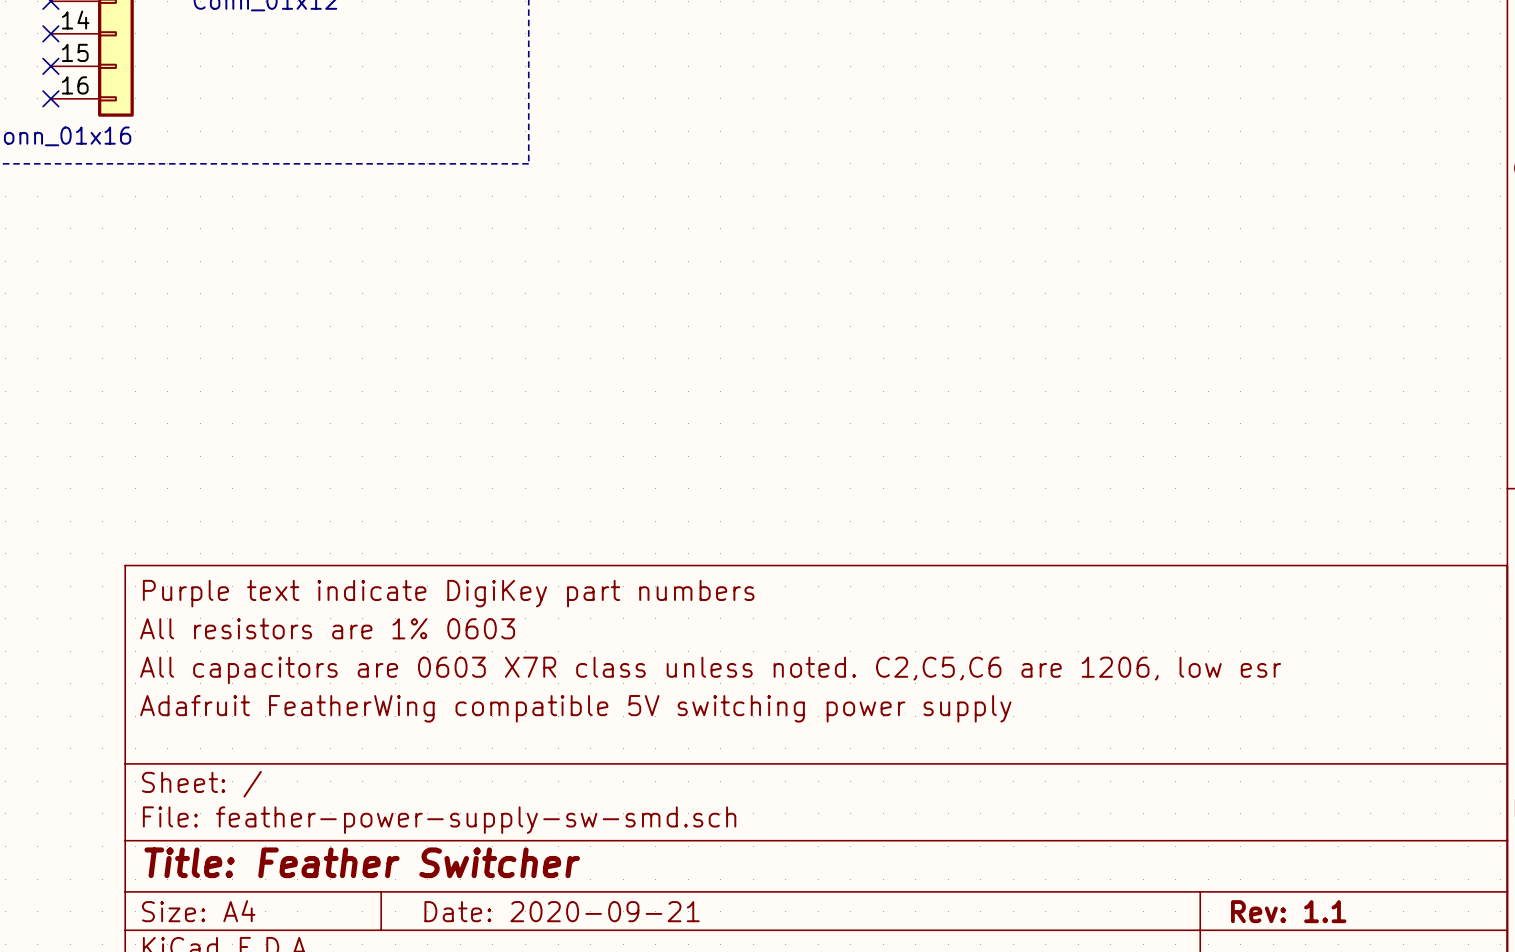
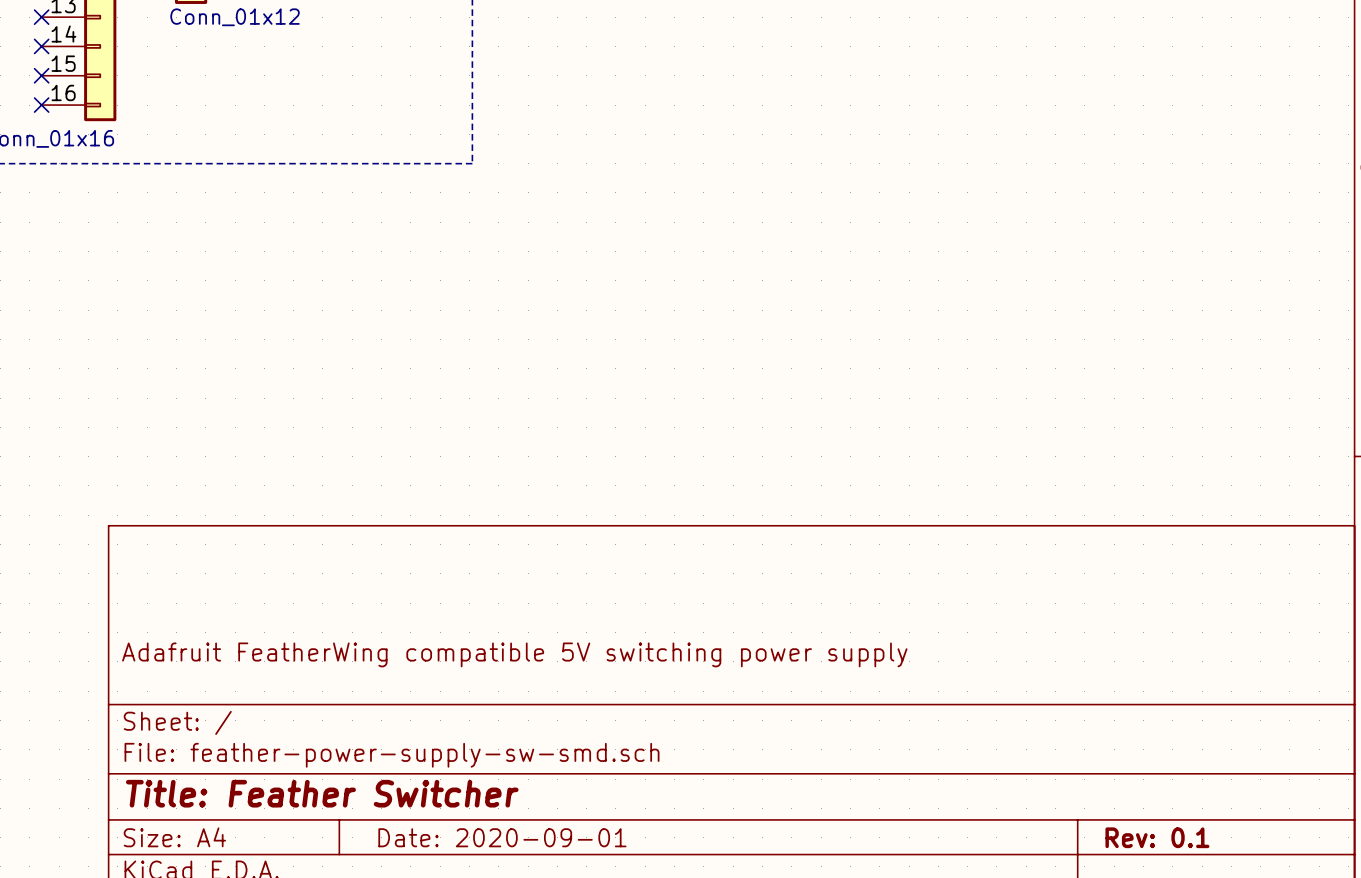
title block: Purple text indicate DigiKey part numbers (448, 593) -> none
title block: All resistors are 1% 0603 (327, 628) -> none
title block: All capacitors are 0603 X7R class unless noted. C2,C5,C6 are 1206, low esr (710, 670) -> none
title block: Date: 2020-09-21 (562, 911) -> Date: 2020-09-01 (502, 837)
title block: Rev: 1.1 (1288, 911) -> Rev: 0.1 (1157, 837)

